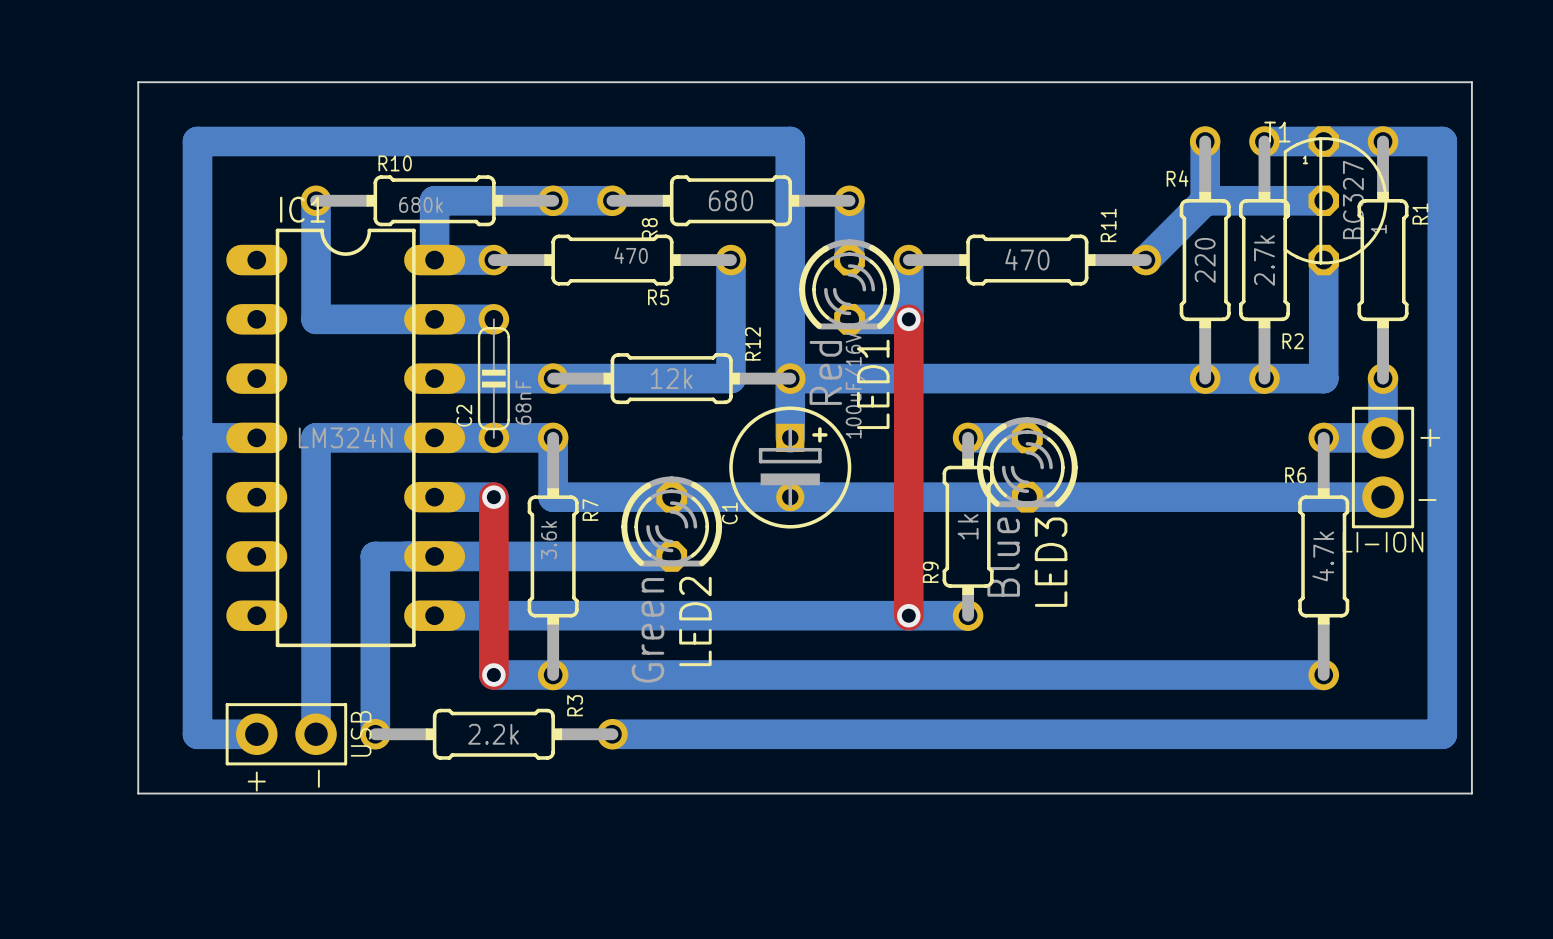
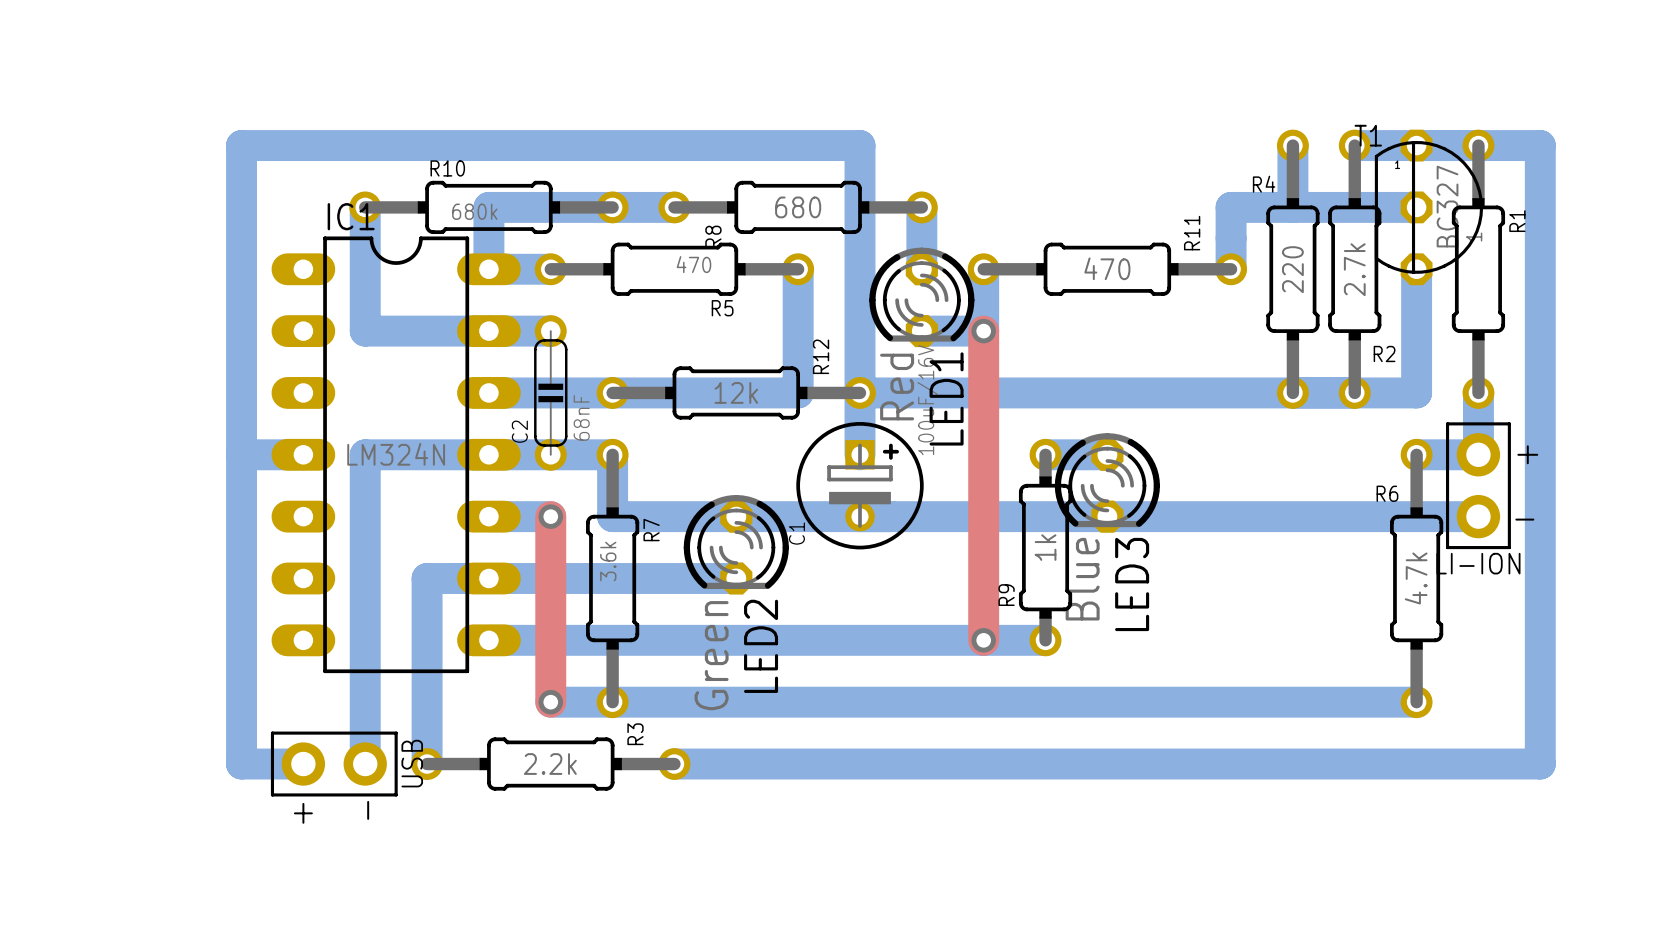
board edge: (138, 82) (1471, 82) (1471, 793) (138, 793) (138, 82) -> none
bottom track: (1205, 200) (1145, 260) -> (1292, 207) (1231, 207) (1231, 269)

